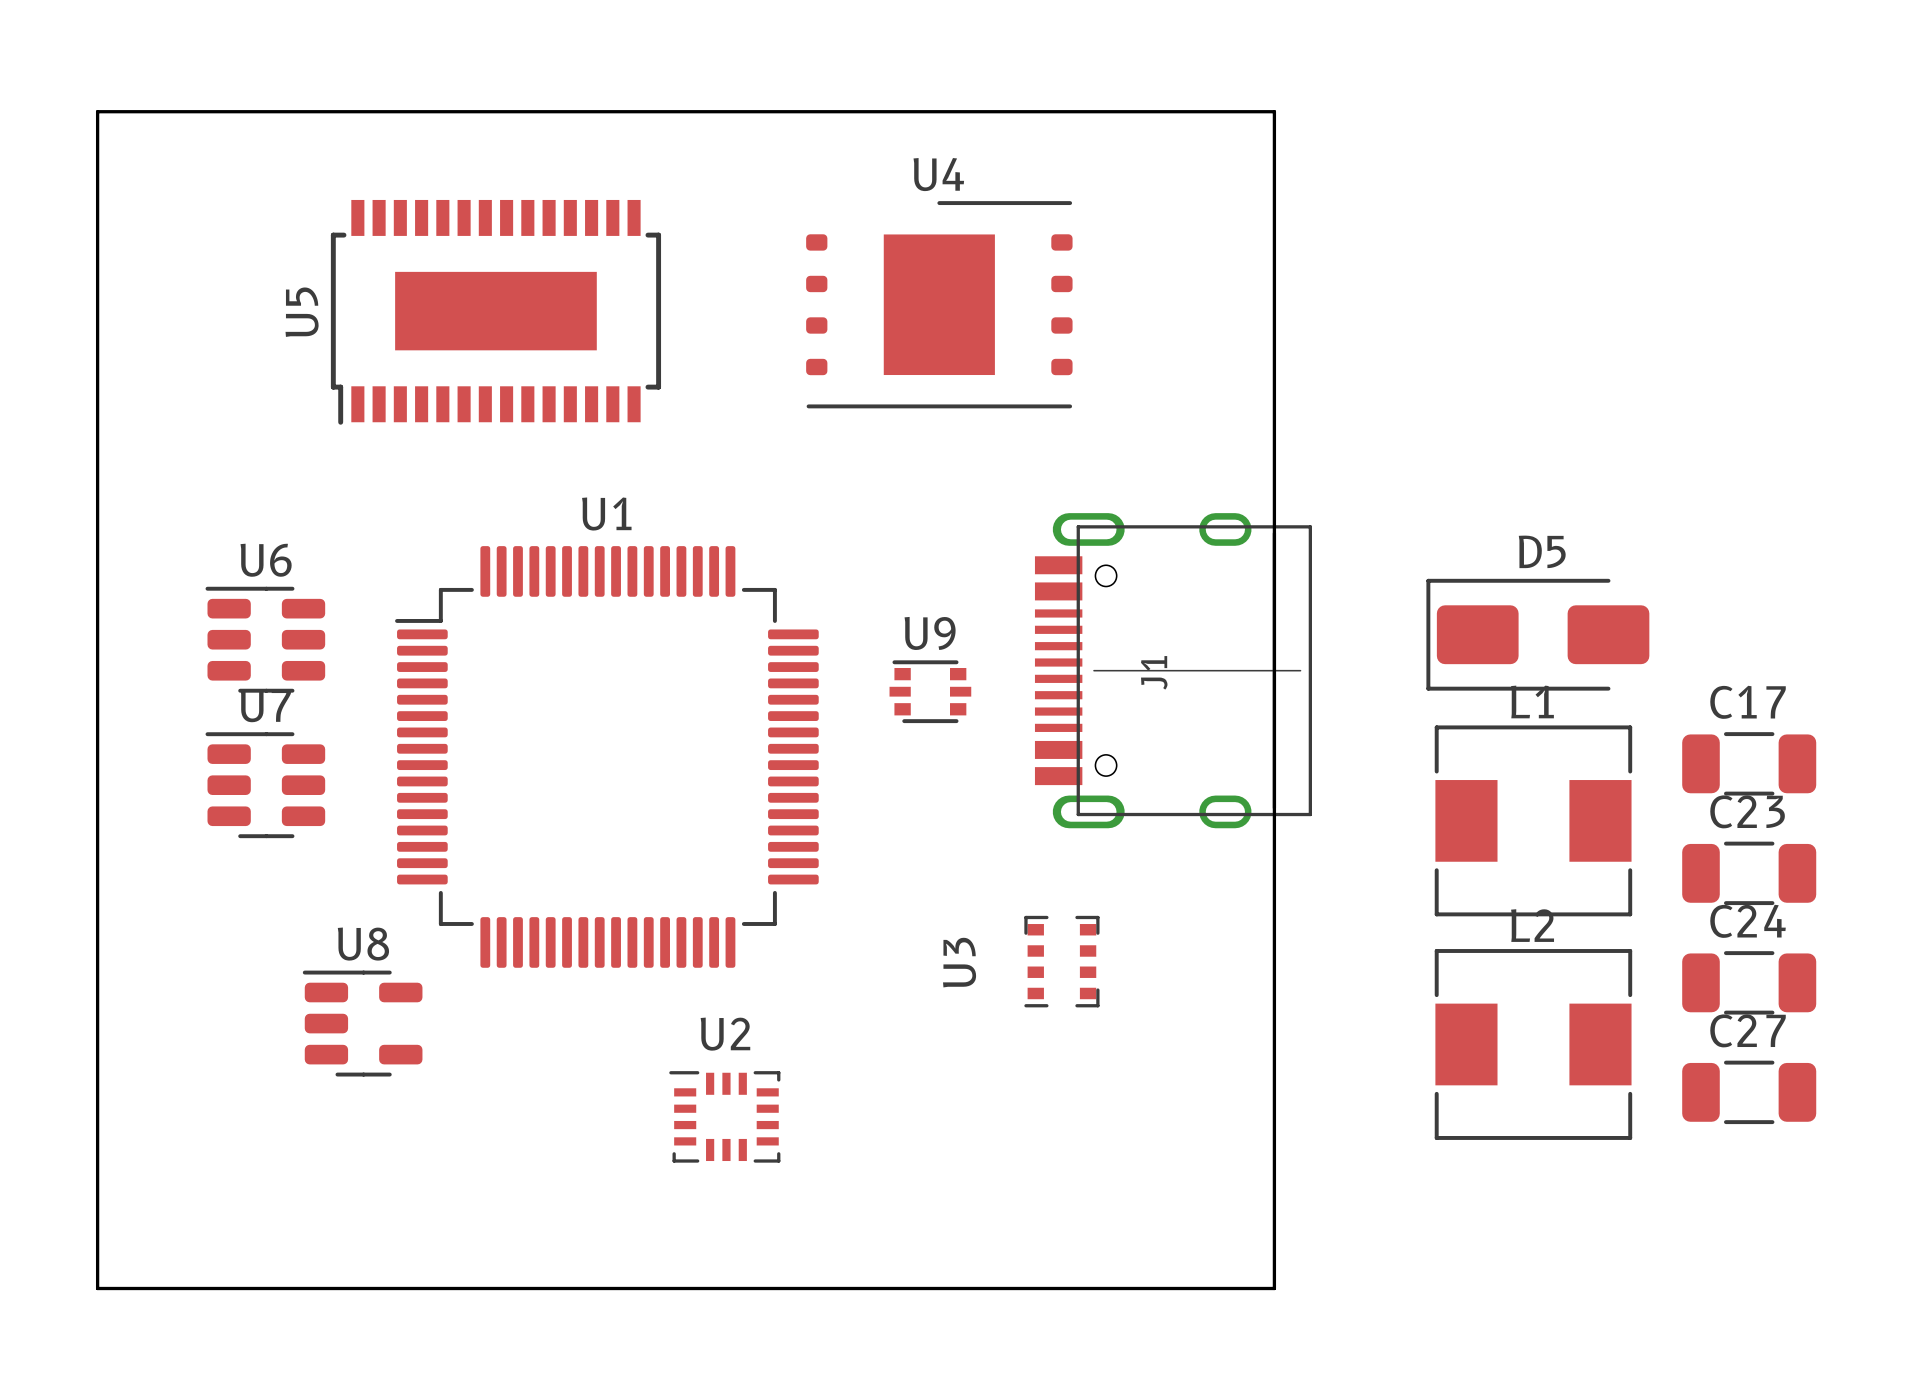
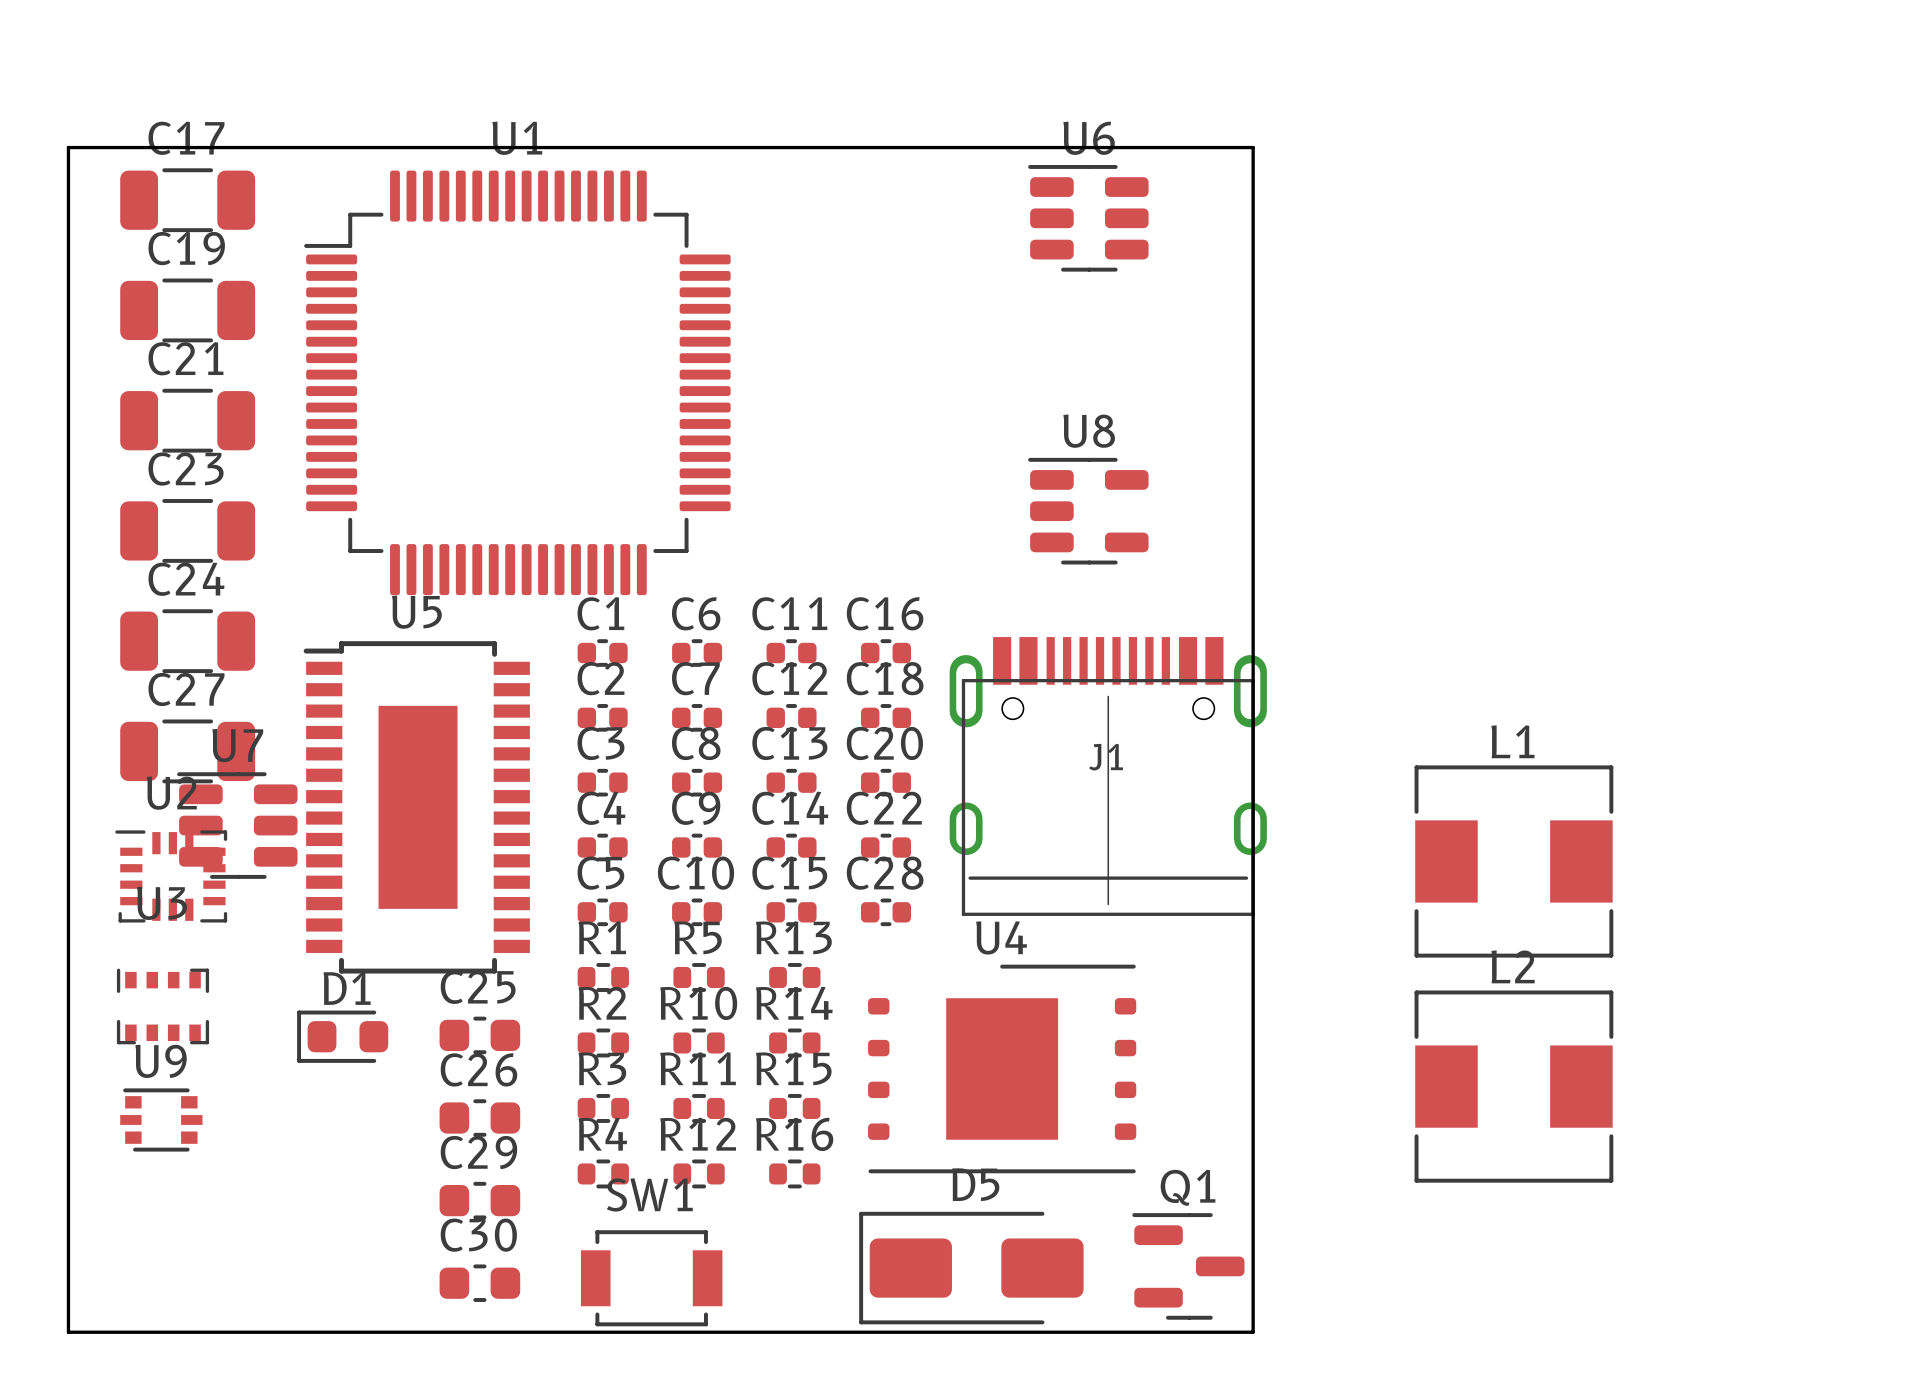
C19: none -> (187, 310)
U4 position: (939, 304) -> (1002, 1068)
U5 rotation: 0° (495, 312) -> 90° clockwise (416, 807)
U5 position: (495, 312) -> (416, 807)
C21: none -> (187, 420)
C1: none -> (602, 653)
C6: none -> (697, 653)
C11: none -> (791, 653)
C16: none -> (885, 653)
D5 position: (1537, 634) -> (971, 1268)
U6 position: (265, 639) -> (1088, 218)
J1 rotation: 0° (1173, 670) -> 90° clockwise (1108, 776)
C2: none -> (602, 717)
C7: none -> (697, 717)
C12: none -> (791, 717)
C18: none -> (885, 717)
U9 position: (930, 691) -> (161, 1119)
C3: none -> (602, 782)
C8: none -> (697, 782)
C13: none -> (791, 782)
C20: none -> (885, 782)
U1 position: (606, 756) -> (517, 382)
C17 position: (1749, 763) -> (187, 200)
C4: none -> (602, 847)
C9: none -> (697, 847)
C14: none -> (791, 847)
C22: none -> (885, 847)
C5: none -> (602, 912)
C10: none -> (697, 912)
C15: none -> (791, 912)
C28: none -> (885, 912)
C23 position: (1749, 873) -> (187, 530)
R1: none -> (603, 977)
R5: none -> (699, 977)
R13: none -> (794, 977)
U3 rotation: 0° (1061, 961) -> 90° clockwise (162, 1006)
U3 position: (1061, 961) -> (162, 1006)
C24 position: (1749, 982) -> (187, 641)
C25: none -> (479, 1035)
D1: none -> (342, 1036)
R2: none -> (603, 1042)
R10: none -> (699, 1042)
R14: none -> (794, 1042)
U8 position: (362, 1023) -> (1088, 511)
R3: none -> (603, 1108)
R11: none -> (699, 1108)
R15: none -> (794, 1108)
C26: none -> (479, 1118)
C27 position: (1749, 1092) -> (187, 751)
U2 position: (724, 1116) -> (171, 876)
R4: none -> (603, 1173)
R12: none -> (699, 1173)
R16: none -> (794, 1173)
C29: none -> (479, 1200)
Q1: none -> (1188, 1266)
SW1: none -> (651, 1278)
C30: none -> (479, 1283)

